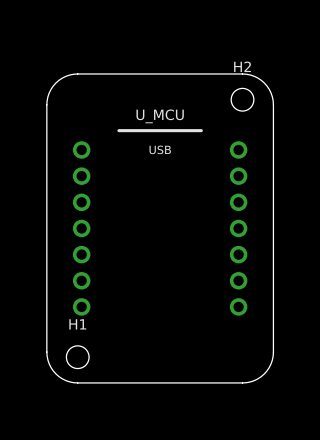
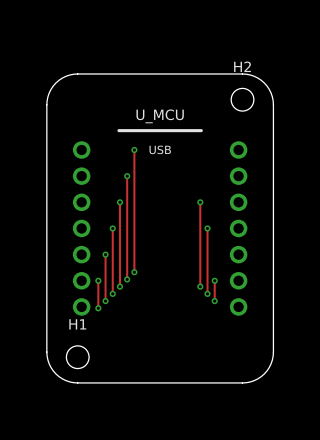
track: none -> (134, 149) (134, 272)
via: none -> (134, 149)
track: none -> (127, 176) (127, 279)
via: none -> (127, 176)
track: none -> (119, 202) (119, 286)
via: none -> (119, 202)
track: none -> (200, 202) (200, 286)
via: none -> (200, 202)
track: none -> (112, 228) (112, 293)
via: none -> (112, 228)
track: none -> (207, 228) (207, 293)
via: none -> (207, 228)
track: none -> (105, 254) (105, 301)
via: none -> (105, 254)
via: none -> (134, 272)
via: none -> (127, 279)
track: none -> (98, 280) (98, 308)
via: none -> (98, 280)
track: none -> (214, 280) (214, 301)
via: none -> (214, 280)
via: none -> (119, 286)
via: none -> (200, 286)
via: none -> (112, 293)
via: none -> (207, 293)
via: none -> (105, 301)
via: none -> (214, 301)
via: none -> (98, 308)

